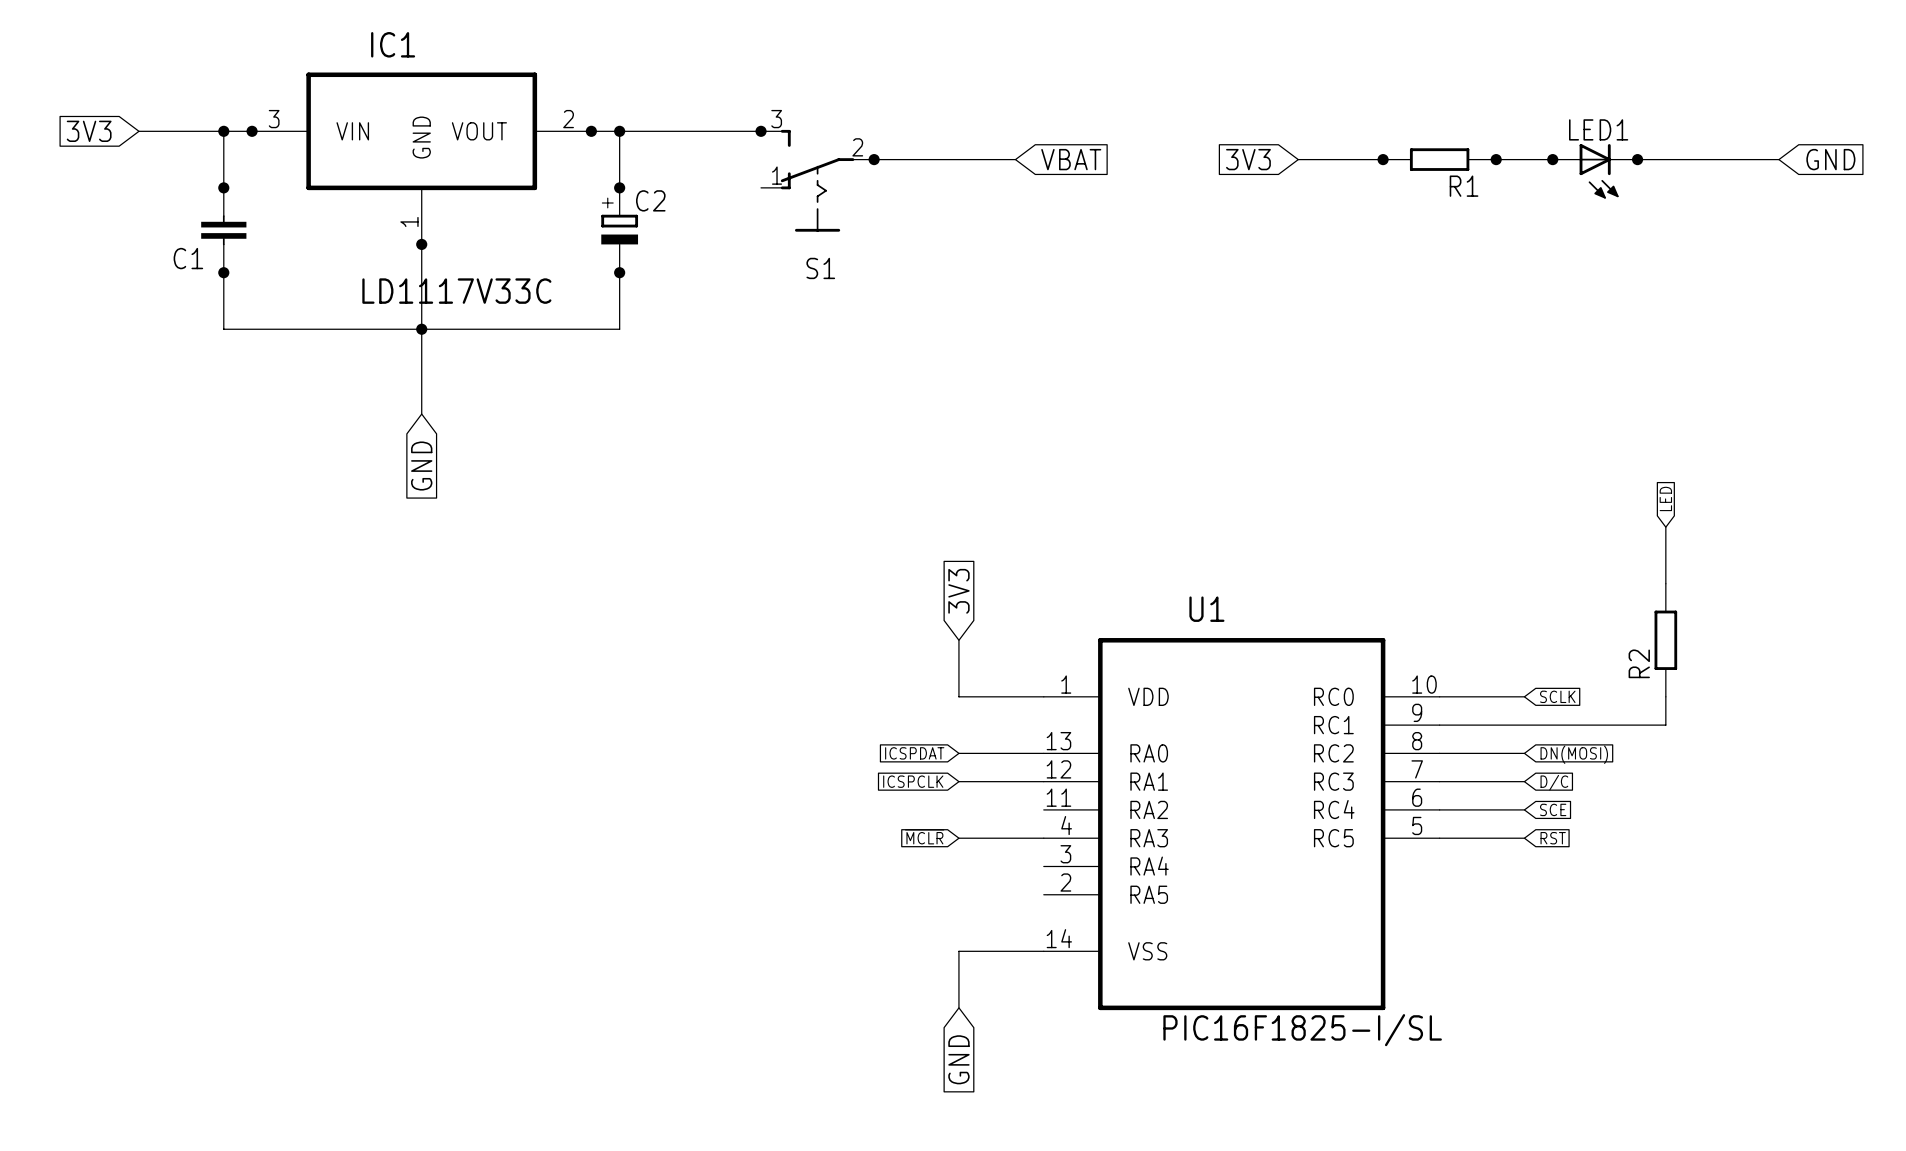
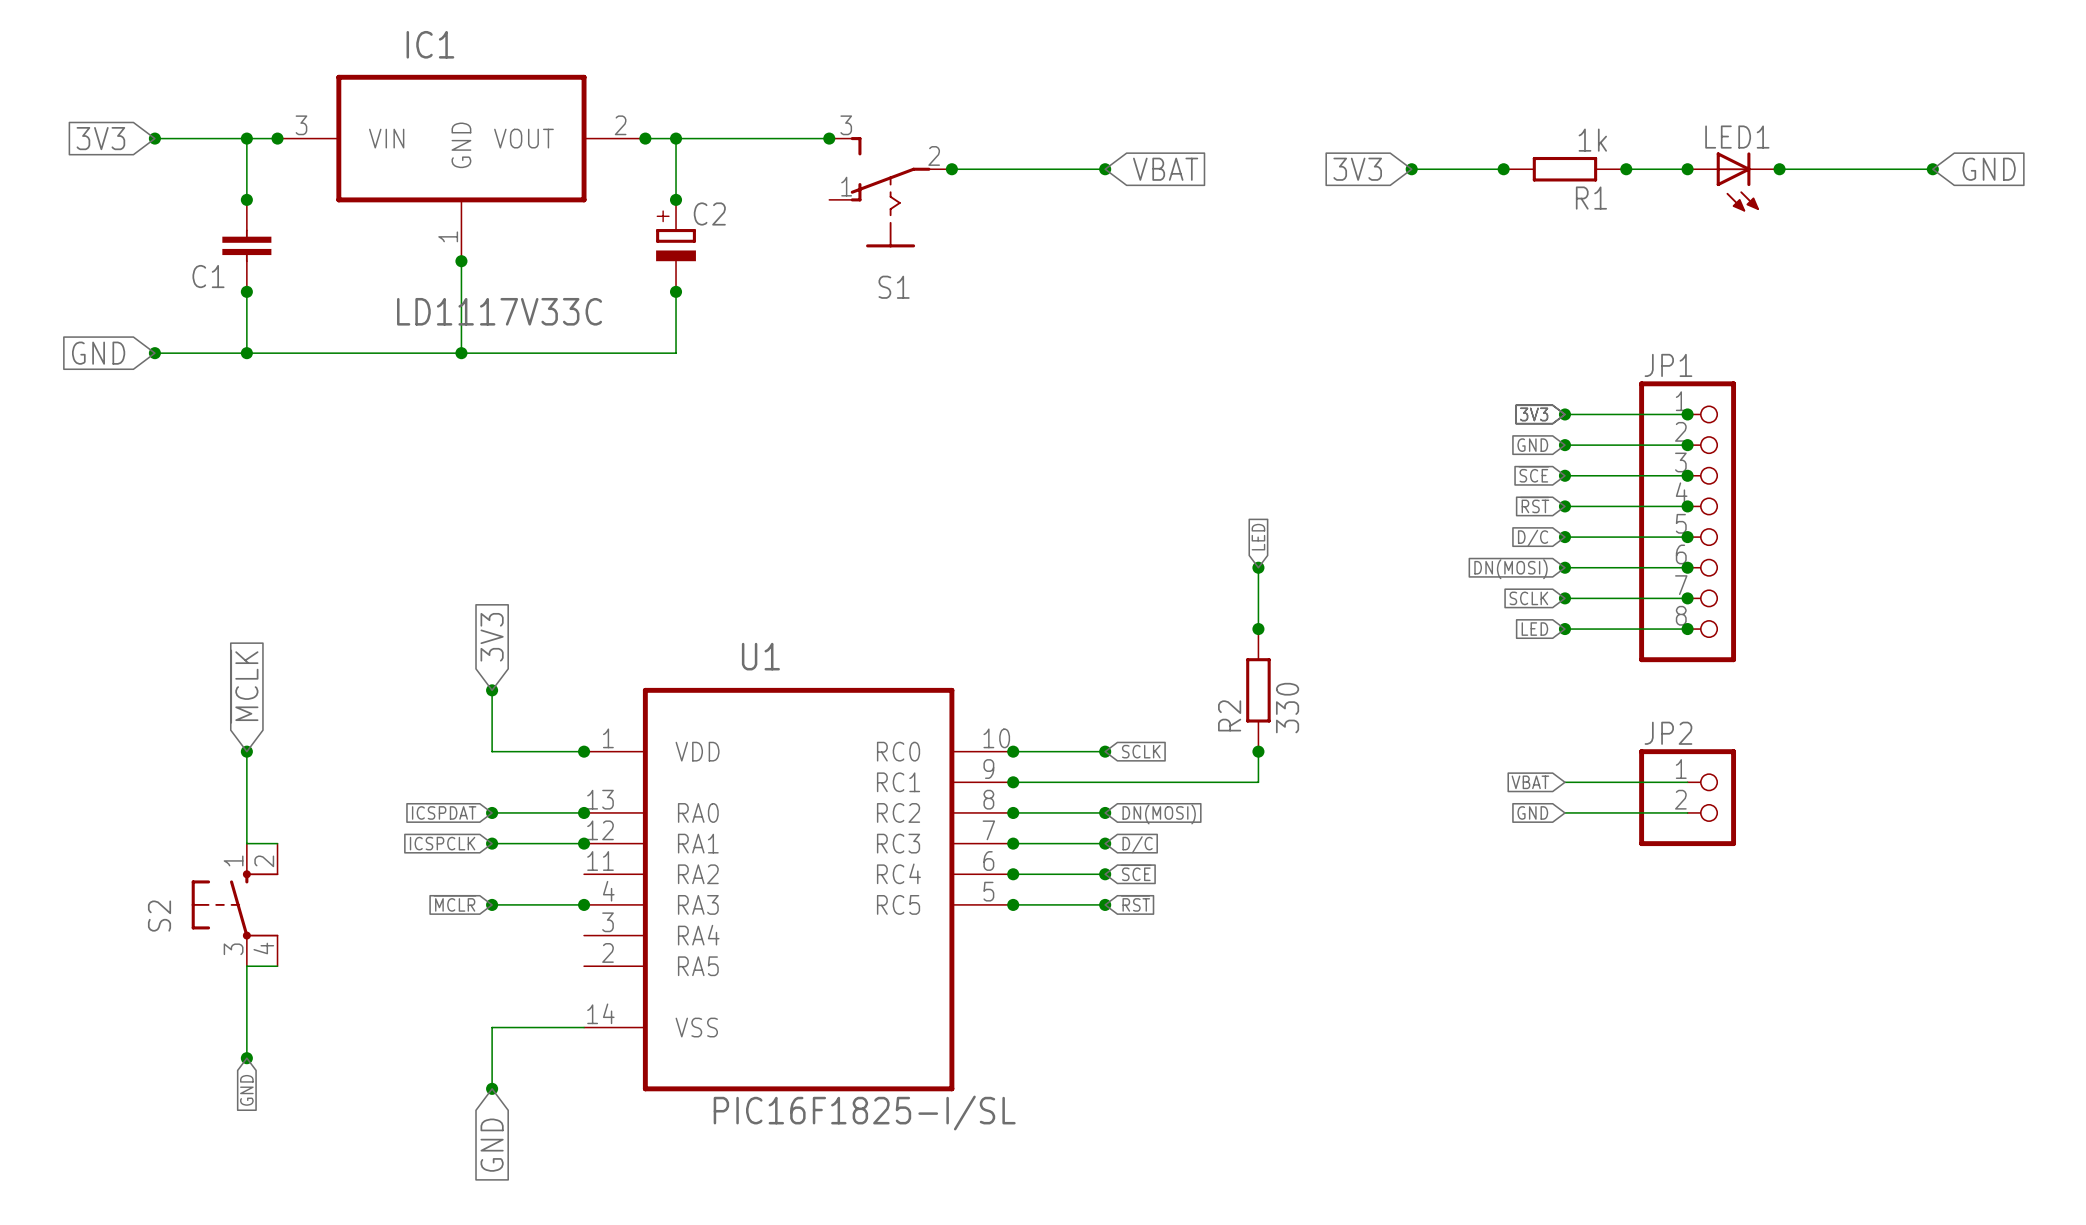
junction: none -> (154, 138)
R1 value: none -> 1k (1592, 140)
junction: none -> (1105, 169)
junction: none -> (1411, 169)
junction: none -> (1932, 169)
global label: none -> GND (98, 353)
wire: none -> (154, 353) (246, 353)
junction: none -> (154, 353)
junction: none -> (246, 353)
wire: (421, 329) (421, 414) -> none
global label: none -> 3V3 (1534, 414)
wire: none -> (1564, 414) (1687, 414)
junction: none -> (1564, 414)
junction: none -> (1687, 414)
global label: none -> GND (1532, 445)
wire: none -> (1564, 445) (1687, 445)
junction: none -> (1564, 445)
junction: none -> (1687, 445)
global label: none -> ~{SCE} (1533, 474)
wire: none -> (1564, 475) (1687, 475)
junction: none -> (1564, 475)
junction: none -> (1687, 475)
global label: GND (421, 466) -> none
global label: none -> ~{RST} (1534, 505)
wire: none -> (1564, 506) (1687, 506)
junction: none -> (1564, 506)
junction: none -> (1687, 506)
JP1: none -> (1687, 521)
global label: none -> LED (1258, 537)
wire: none -> (1564, 537) (1687, 537)
junction: none -> (1564, 537)
junction: none -> (1687, 537)
global label rotation: 0° (1665, 498) -> 90° counterclockwise (1534, 629)
global label position: LED (1665, 498) -> LED (1534, 629)
global label: none -> D/C (1533, 538)
wire: none -> (1258, 567) (1258, 629)
junction: none -> (1258, 567)
wire: none -> (1564, 567) (1687, 567)
junction: none -> (1564, 567)
junction: none -> (1687, 567)
wire: (1665, 527) (1665, 583) -> none
wire: none -> (1564, 598) (1687, 598)
junction: none -> (1564, 598)
junction: none -> (1687, 598)
junction: none -> (1258, 629)
wire: none -> (1564, 629) (1687, 629)
junction: none -> (1564, 629)
junction: none -> (1687, 629)
global label: none -> 3V3 (492, 637)
global label: 3V3 (958, 591) -> none
global label: none -> ~{MCLK} (244, 686)
wire: none -> (492, 690) (492, 751) (584, 751)
junction: none -> (492, 690)
wire: (958, 640) (958, 696) -> (1013, 751) (1043, 751)
R2 position: (1665, 640) -> (1258, 690)
R2 value: none -> 330 (1287, 708)
wire: none -> (246, 751) (246, 843) (277, 843)
junction: none -> (246, 751)
junction: none -> (584, 751)
junction: none -> (1013, 751)
wire: (1015, 696) (1043, 696) -> none
junction: none -> (1105, 751)
global label: none -> SCLK (1141, 751)
wire: none -> (1258, 751) (1258, 782) (1013, 782)
junction: none -> (1258, 751)
wire: (1439, 696) (1524, 696) -> none
global label rotation: 0° (1557, 696) -> 180° (1528, 598)
global label position: SCLK (1557, 696) -> SCLK (1528, 598)
wire: (1665, 696) (1665, 725) (1552, 725) -> none
junction: none -> (1013, 782)
global label: none -> VBAT (1530, 782)
JP2: none -> (1687, 797)
global label: none -> ICSPDAT (444, 812)
wire: none -> (492, 812) (584, 812)
junction: none -> (492, 812)
junction: none -> (584, 812)
global label: ICSPDAT (914, 753) -> none
junction: none -> (1013, 812)
wire: (1015, 753) (1043, 753) -> (1013, 812) (1043, 812)
junction: none -> (1105, 812)
global label: none -> GND (1532, 812)
wire: none -> (1656, 812) (1687, 812)
global label: none -> DN(MOSI) (1159, 814)
global label rotation: 0° (1574, 754) -> 180° (1510, 569)
global label position: DN(MOSI) (1574, 754) -> DN(MOSI) (1510, 569)
global label: none -> ICSPCLK (442, 843)
wire: none -> (492, 843) (584, 843)
junction: none -> (492, 843)
junction: none -> (584, 843)
global label: ICSPCLK (913, 781) -> none
junction: none -> (1013, 843)
wire: (1015, 781) (1043, 781) -> (1013, 843) (1043, 843)
junction: none -> (1105, 843)
wire: (1439, 781) (1524, 781) -> none
global label: none -> D/C (1137, 844)
global label: D/C (1554, 782) -> none
global label: none -> ~{SCE} (1136, 872)
wire: none -> (1013, 874) (1105, 874)
junction: none -> (1013, 874)
junction: none -> (1105, 874)
wire: (1439, 809) (1524, 809) -> none
global label: SCE (1553, 809) -> none
U1 position: (1241, 824) -> (798, 889)
global label: none -> ~{MCLR} (454, 903)
global label: ~{MCLR} (924, 836) -> none
global label: none -> ~{RST} (1135, 903)
S2: none -> (235, 904)
wire: none -> (492, 904) (584, 904)
junction: none -> (492, 904)
junction: none -> (584, 904)
junction: none -> (1013, 904)
wire: (1015, 838) (1043, 838) -> (1013, 904) (1043, 904)
junction: none -> (1105, 904)
wire: (1439, 838) (1524, 838) -> none
global label: RST (1553, 838) -> none
wire: none -> (277, 966) (246, 966) (246, 1058)
wire: none -> (584, 1027) (492, 1027) (492, 1088)
wire: (1043, 951) (958, 951) (958, 1007) -> none
junction: none -> (246, 1058)
junction: none -> (492, 1088)
global label: none -> GND (246, 1090)
global label: none -> GND (492, 1145)
global label: GND (958, 1059) -> none

